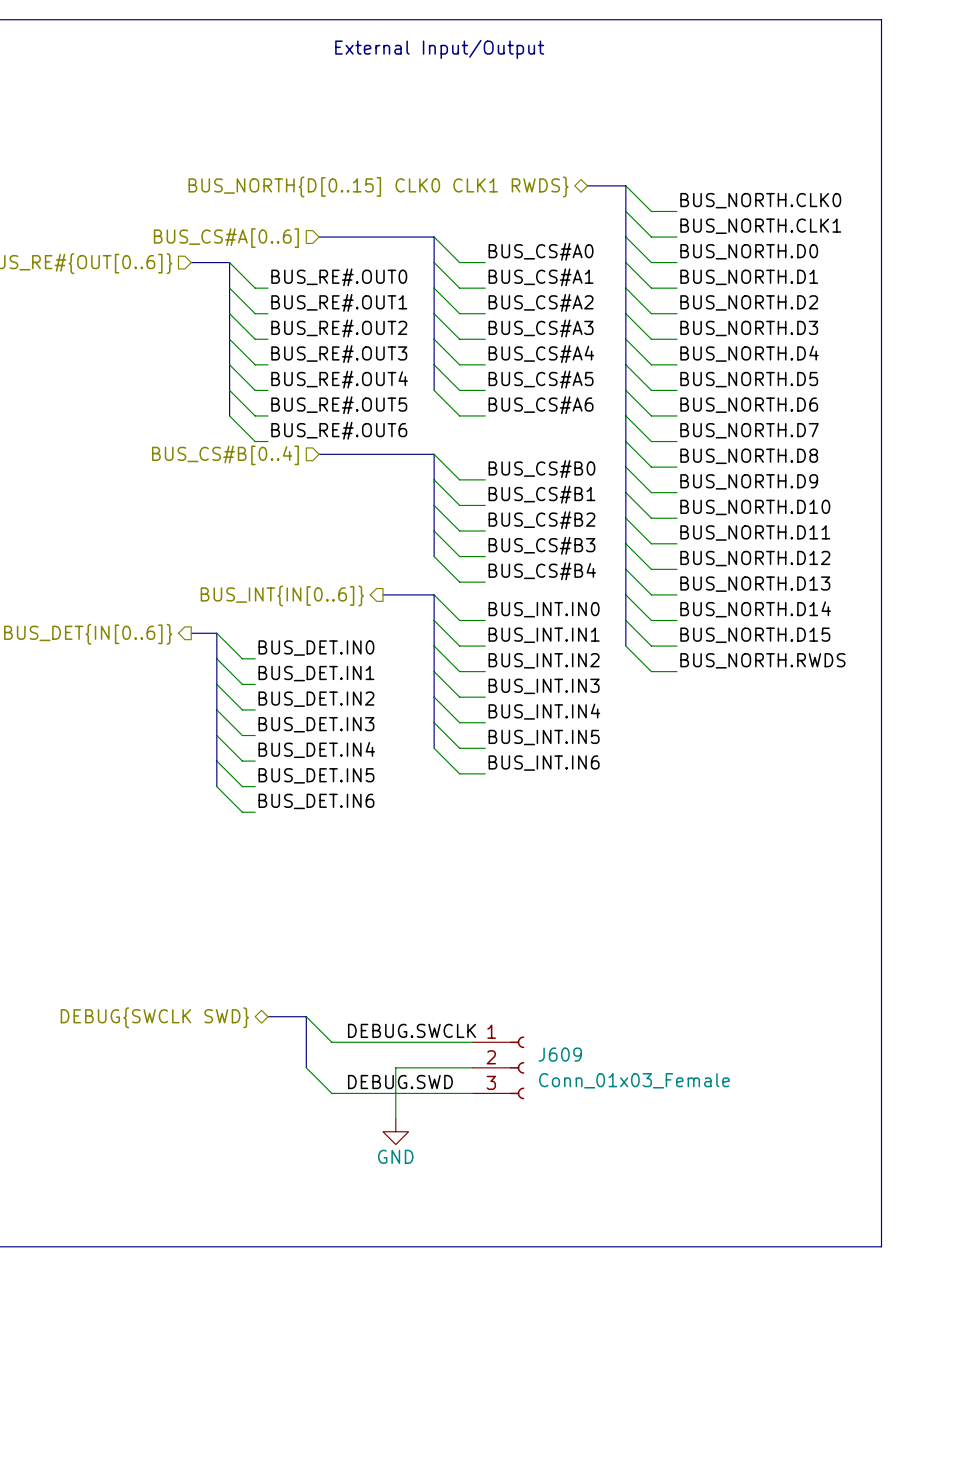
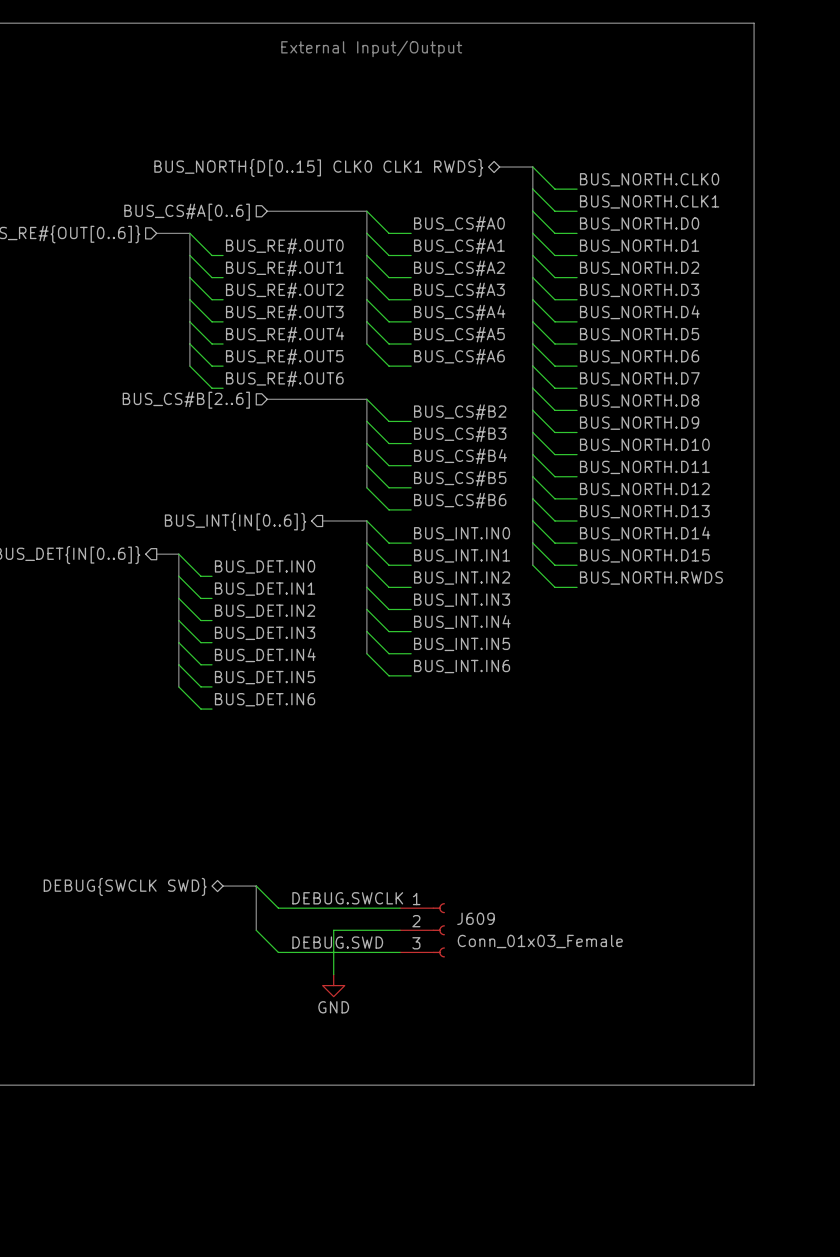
hierarchical label: BUS_CS#B[0..4] (225, 455) -> BUS_CS#B[2..6] (186, 400)
label: BUS_CS#B0 (541, 469) -> BUS_CS#B2 (460, 412)
label: BUS_CS#B1 (541, 494) -> BUS_CS#B3 (460, 434)
label: BUS_CS#B2 (541, 520) -> BUS_CS#B4 (460, 456)
label: BUS_CS#B3 (541, 545) -> BUS_CS#B5 (460, 478)
label: BUS_CS#B4 (542, 571) -> BUS_CS#B6 (460, 500)

